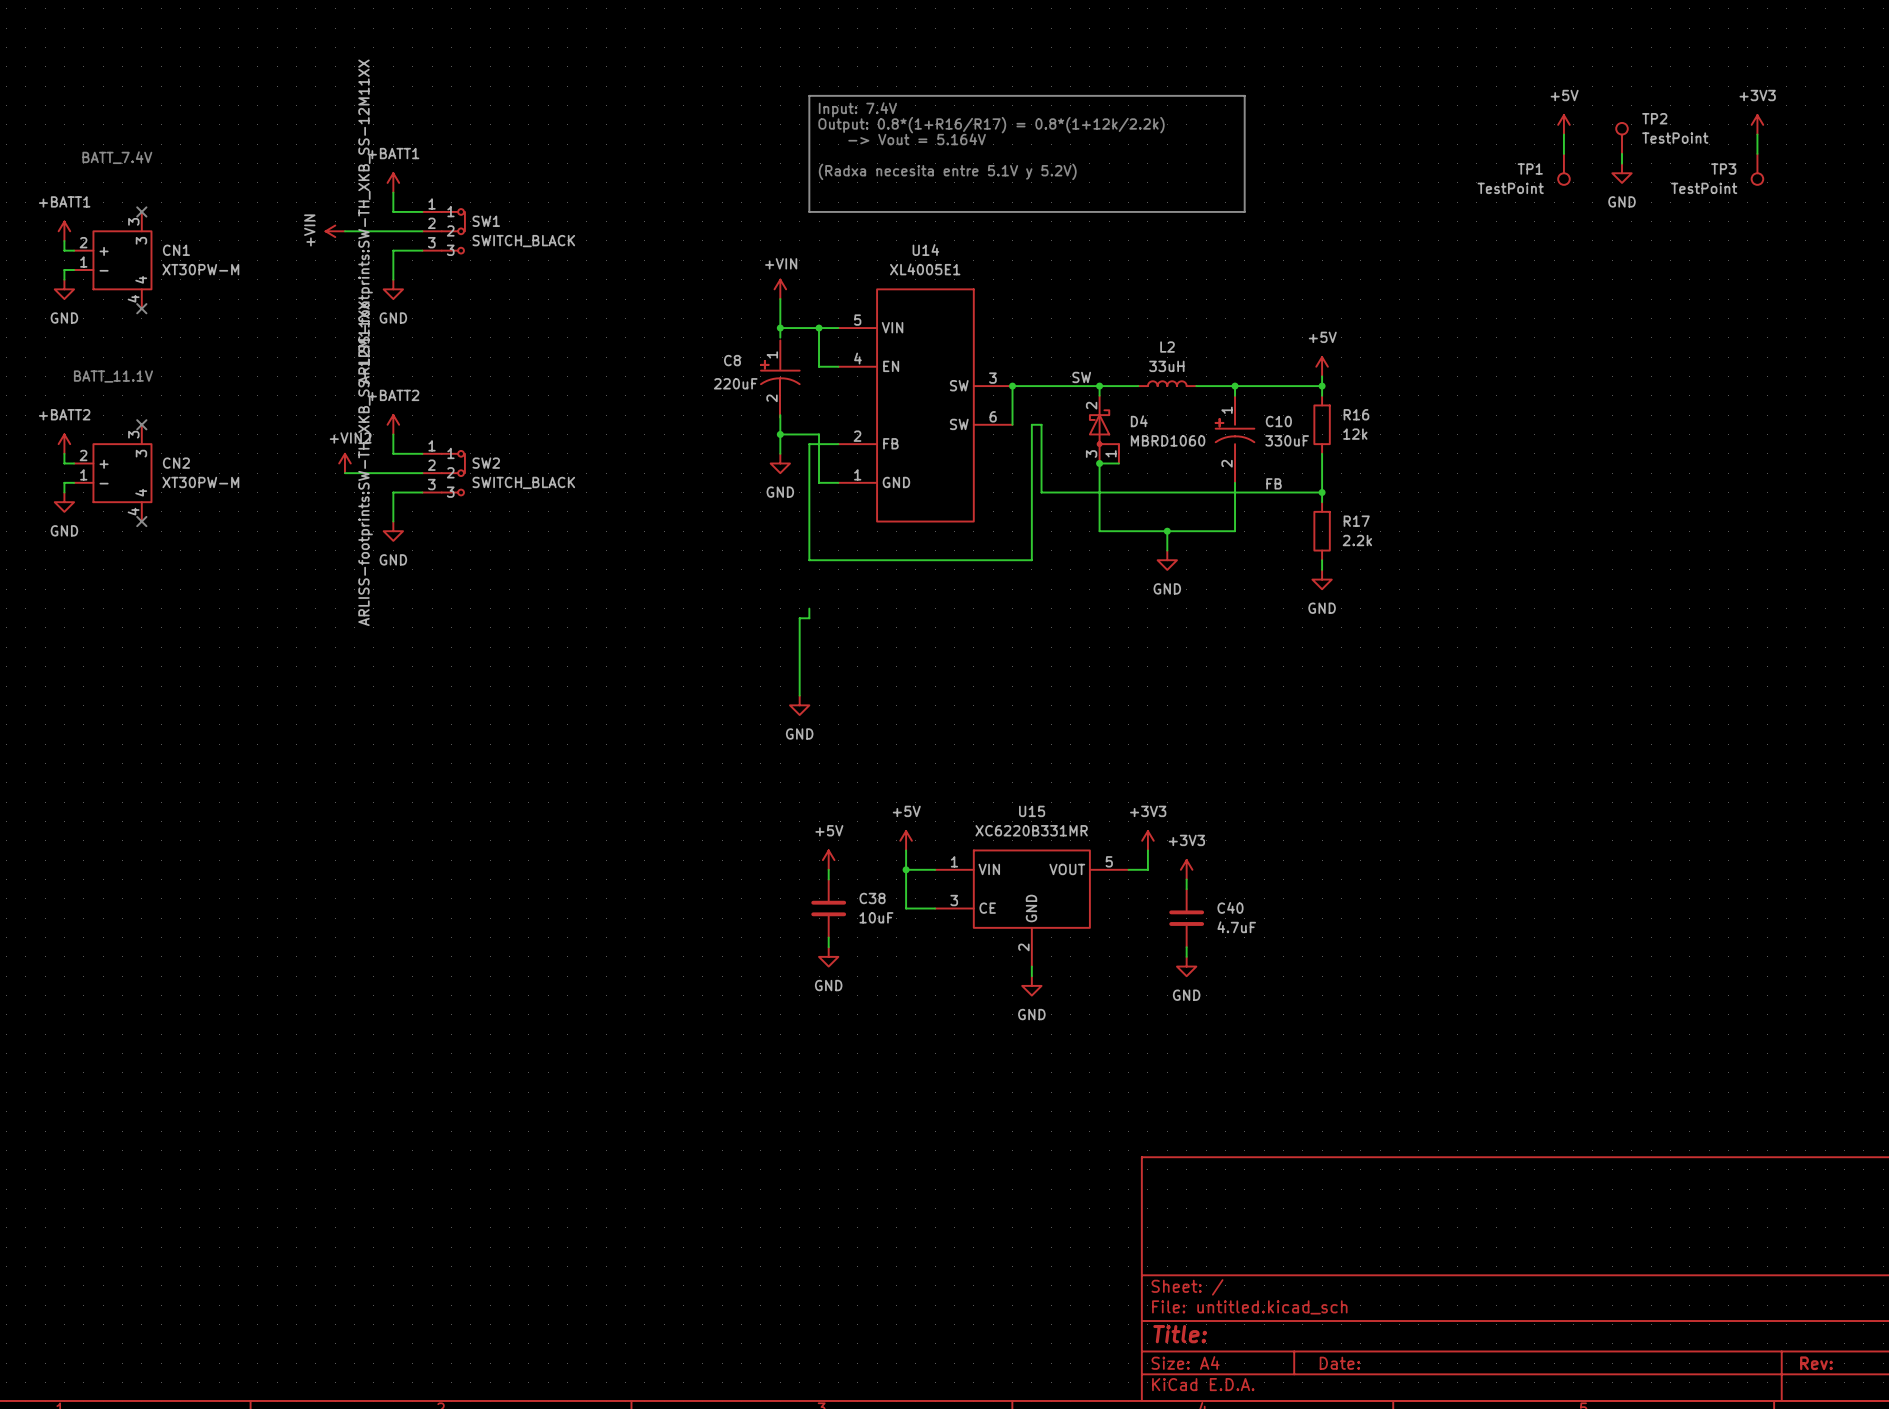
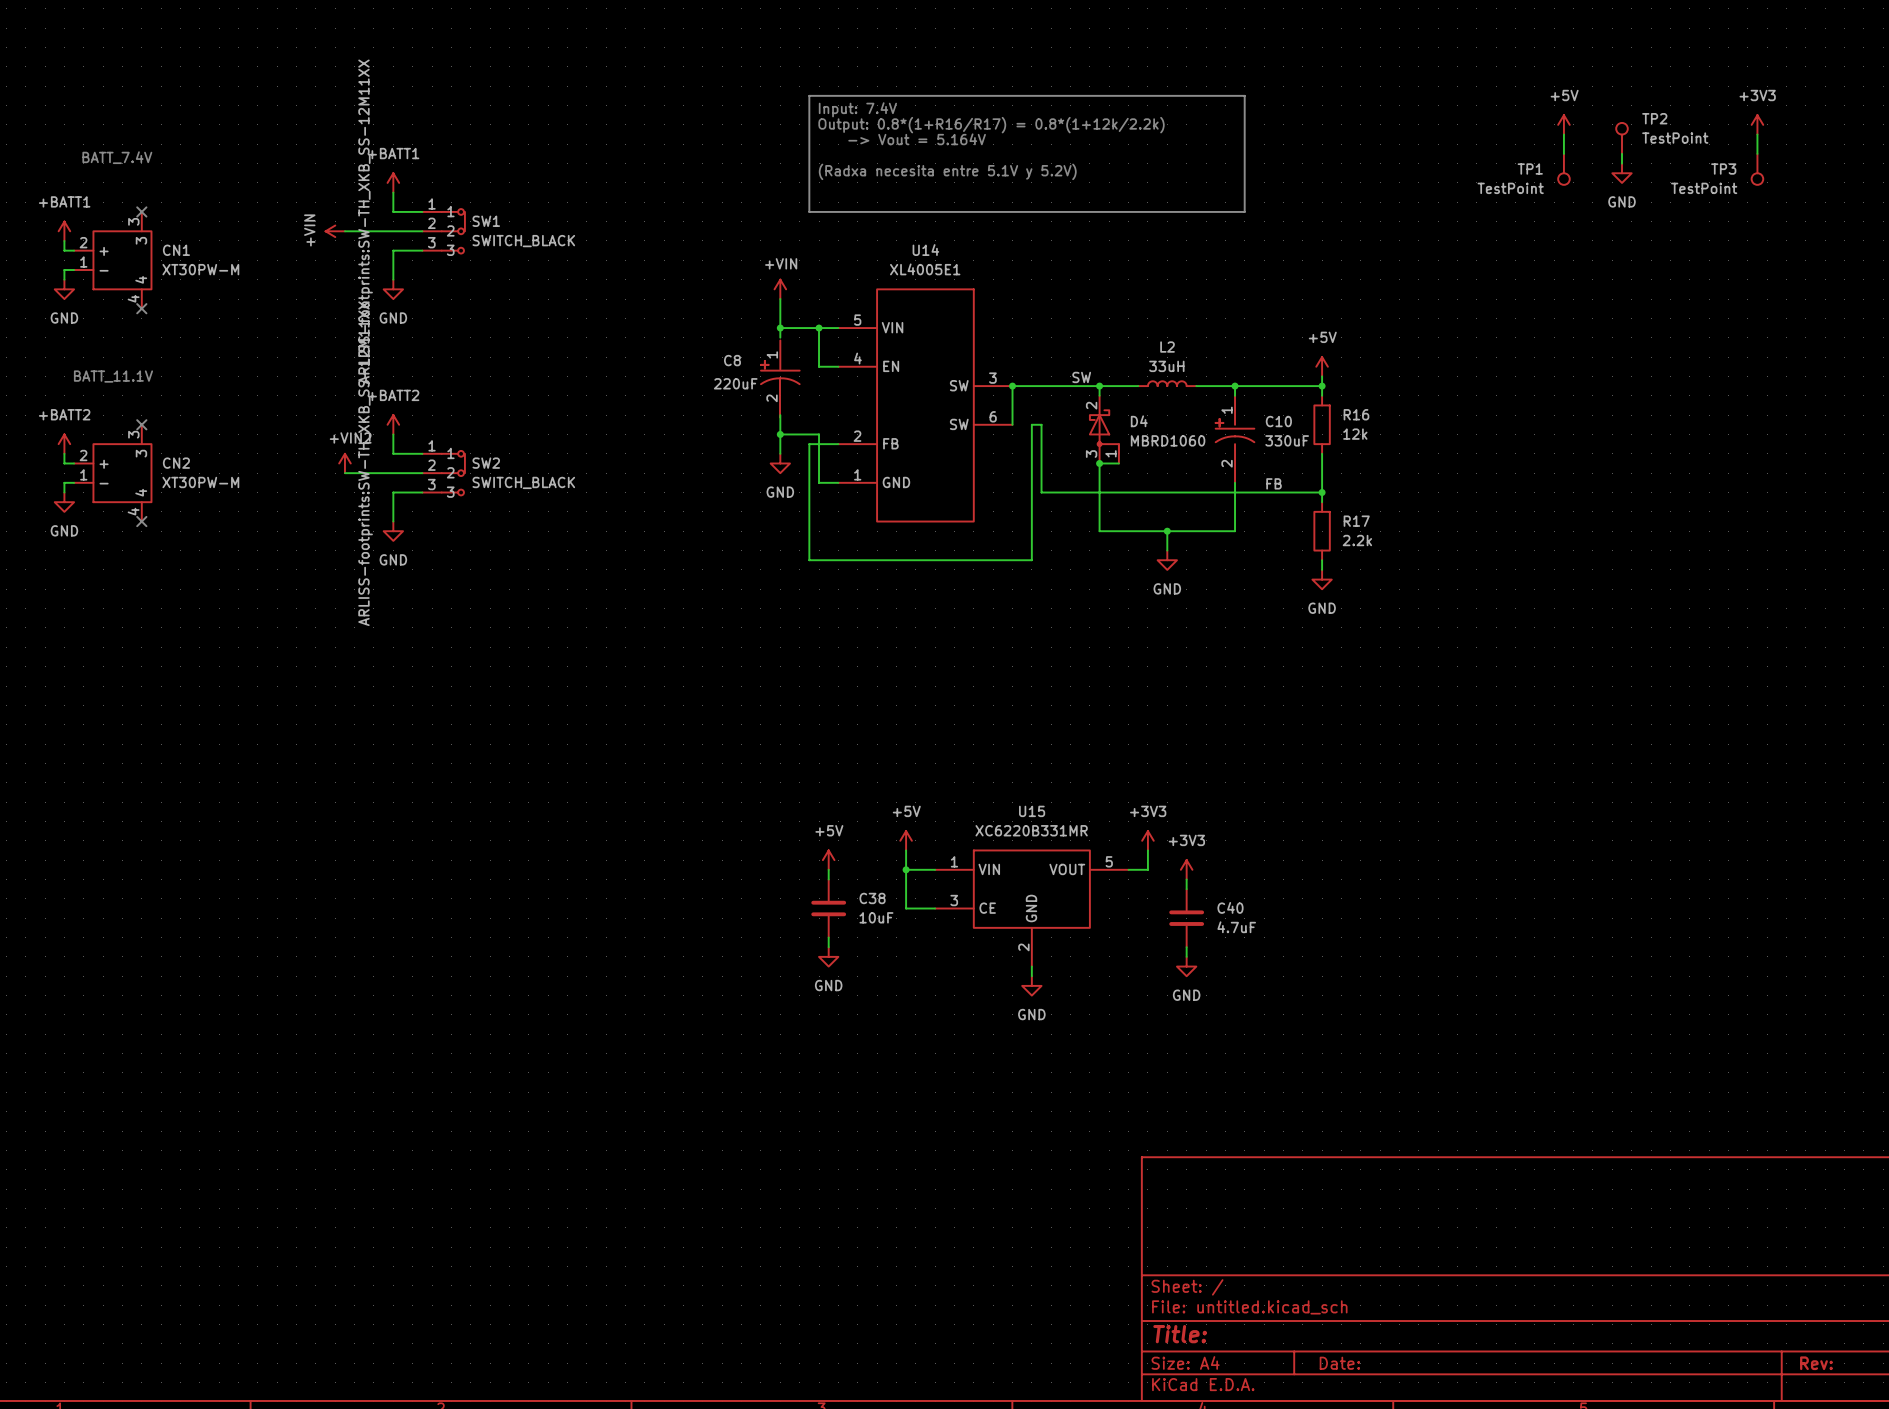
wire: (809, 608) (809, 618) (799, 618) (799, 695) -> none
power symbol: GND (799, 705) -> none

